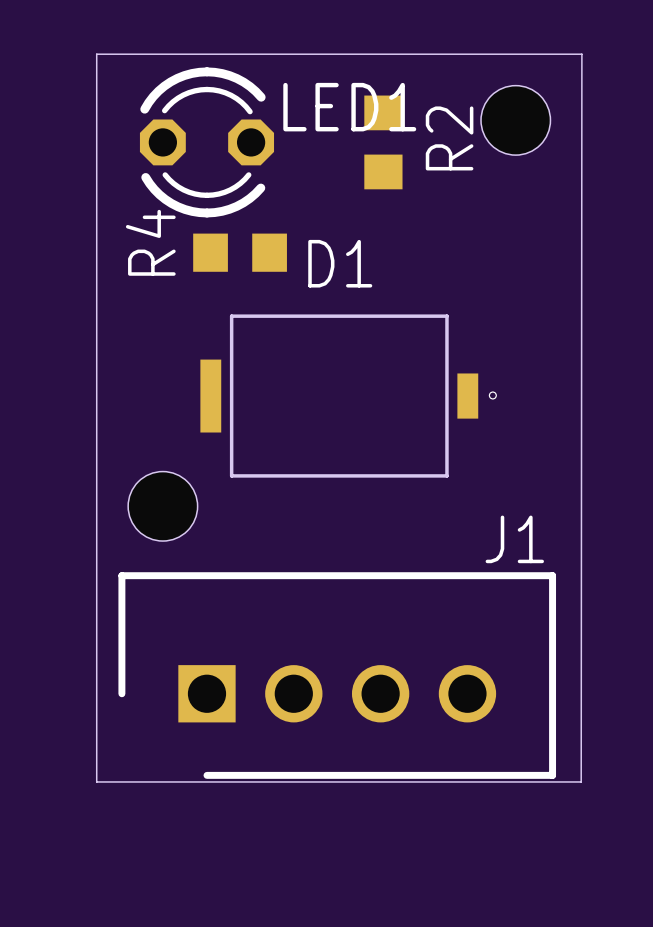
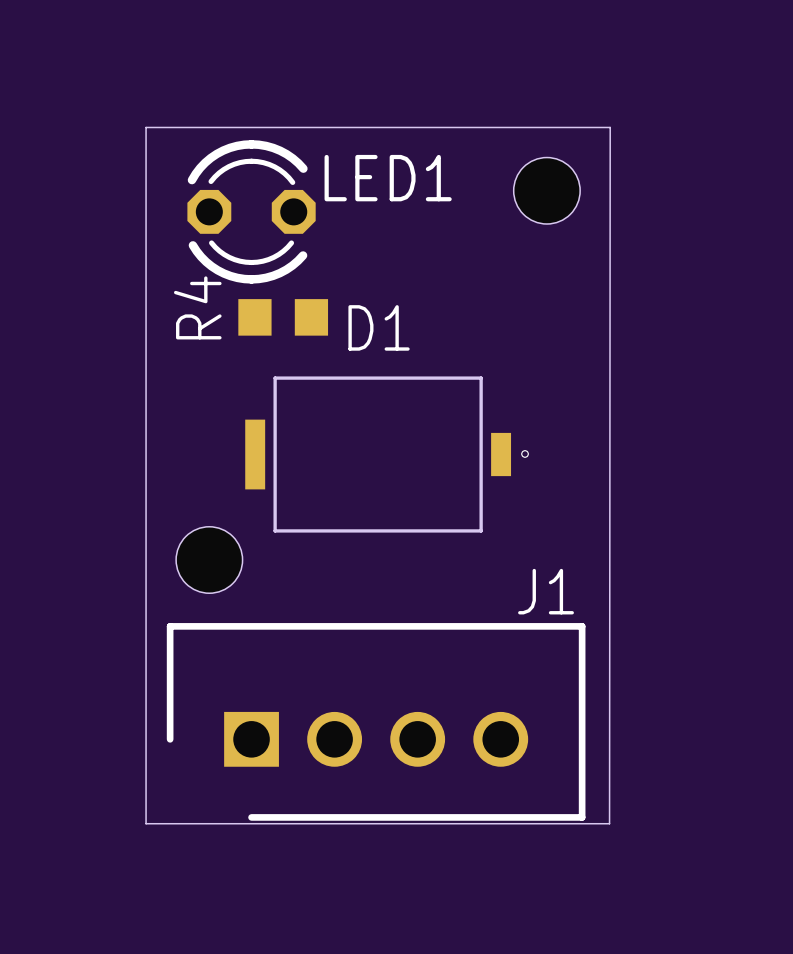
R2: (383, 142) -> none

